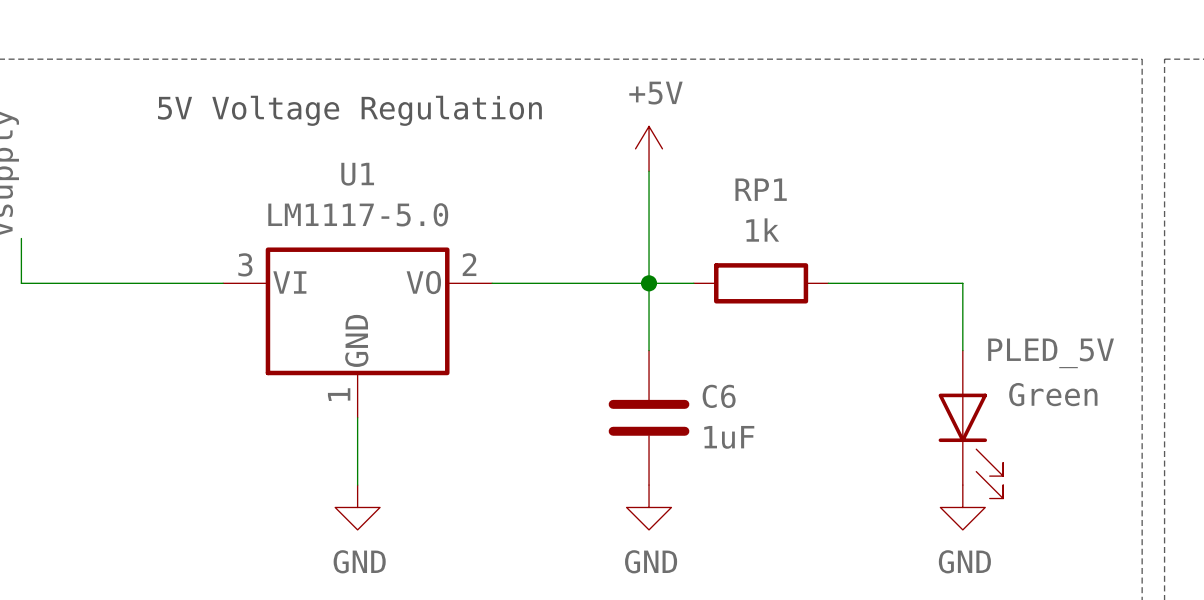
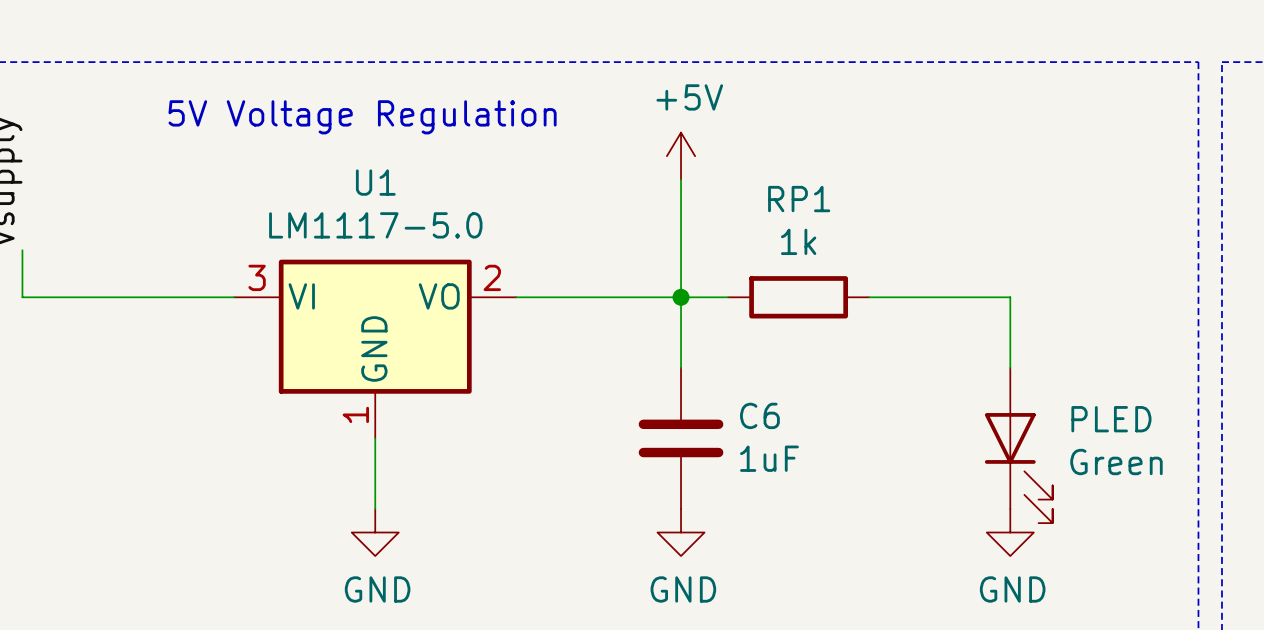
PLED_5V name: PLED_5V (1051, 353) -> PLED (1111, 419)
PLED_5V value position: Green (1053, 394) -> Green (1116, 462)

